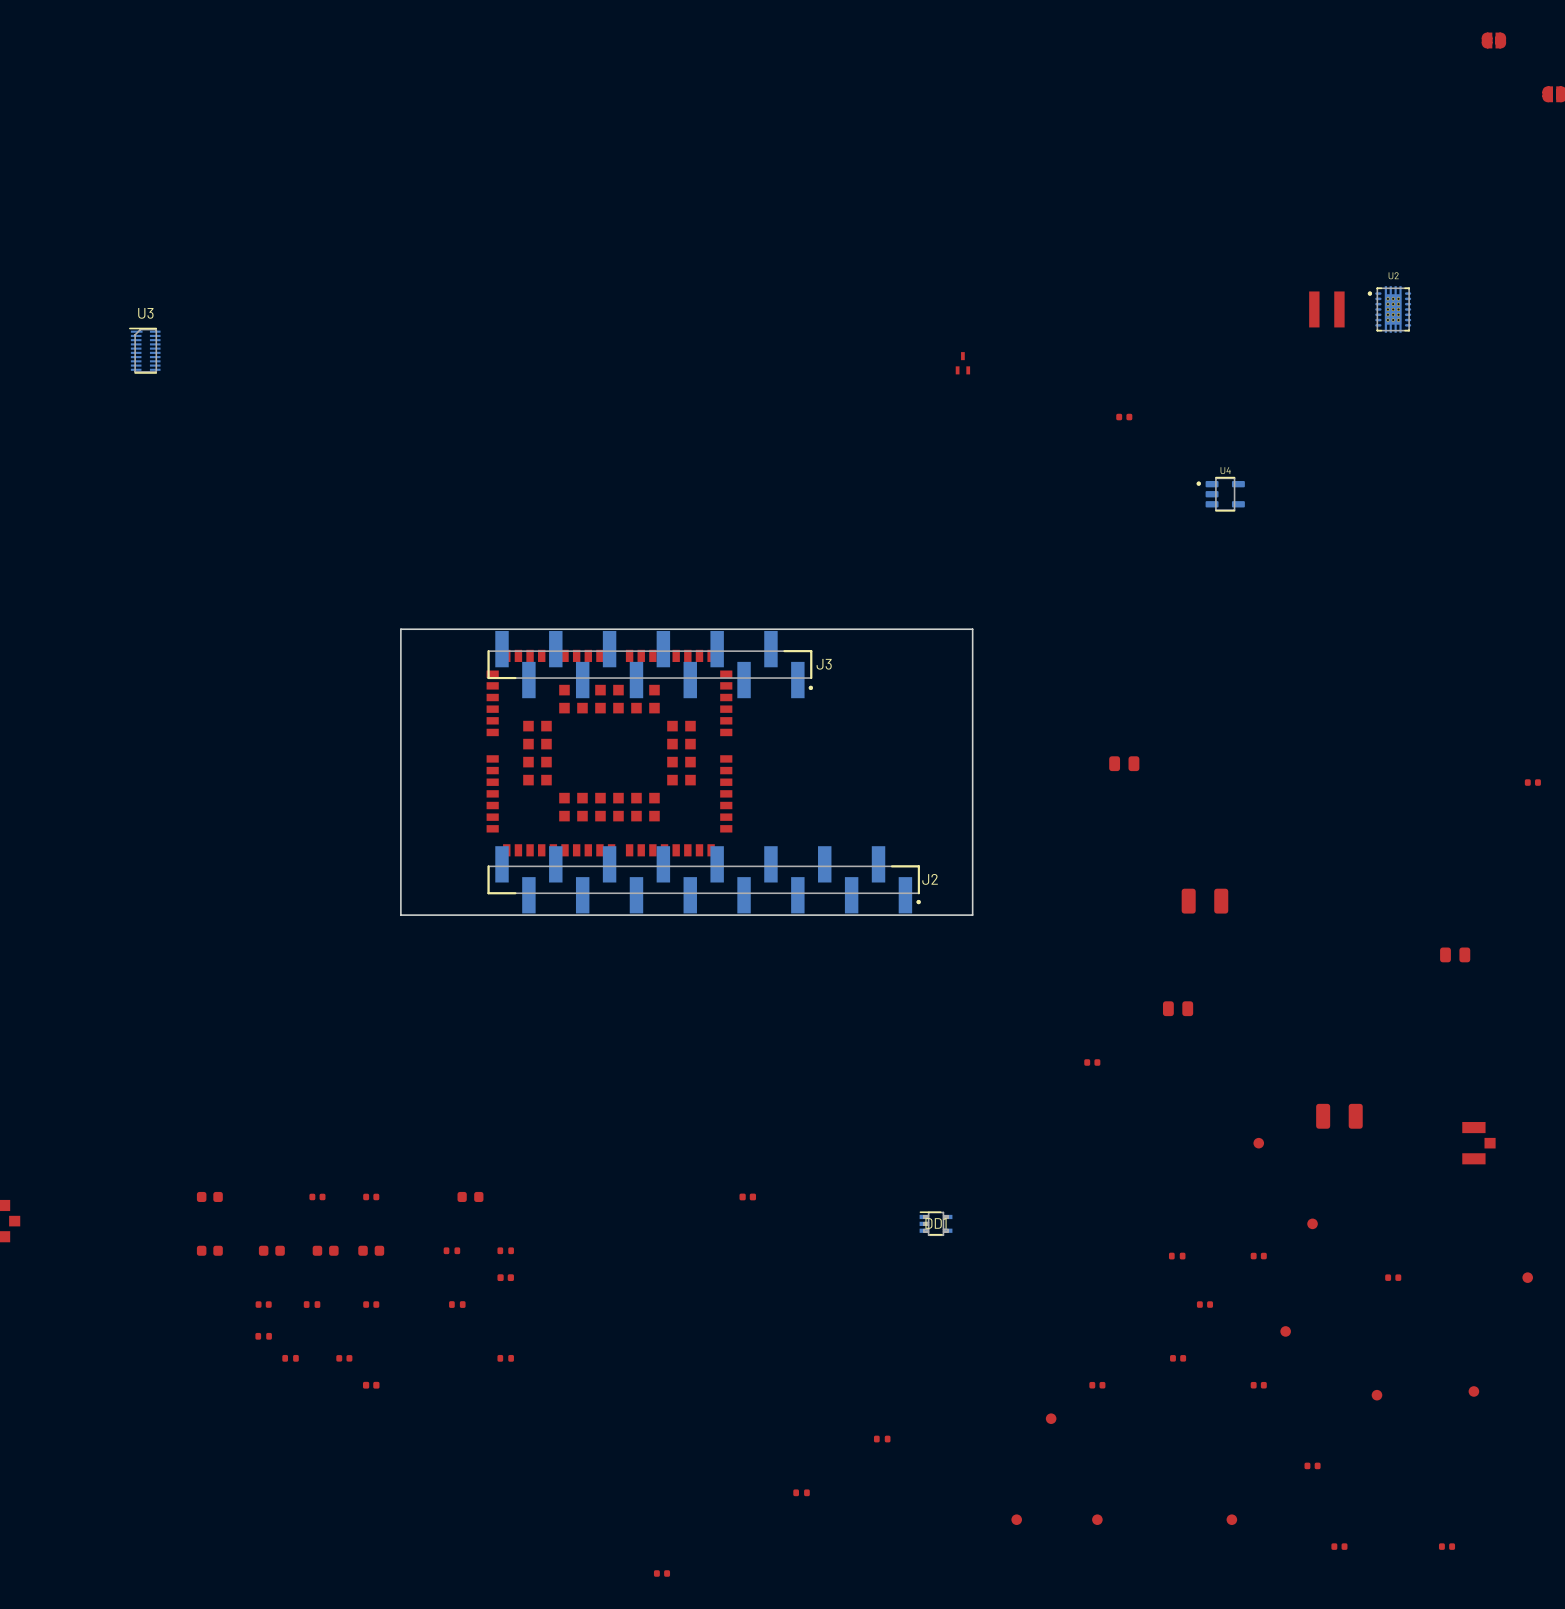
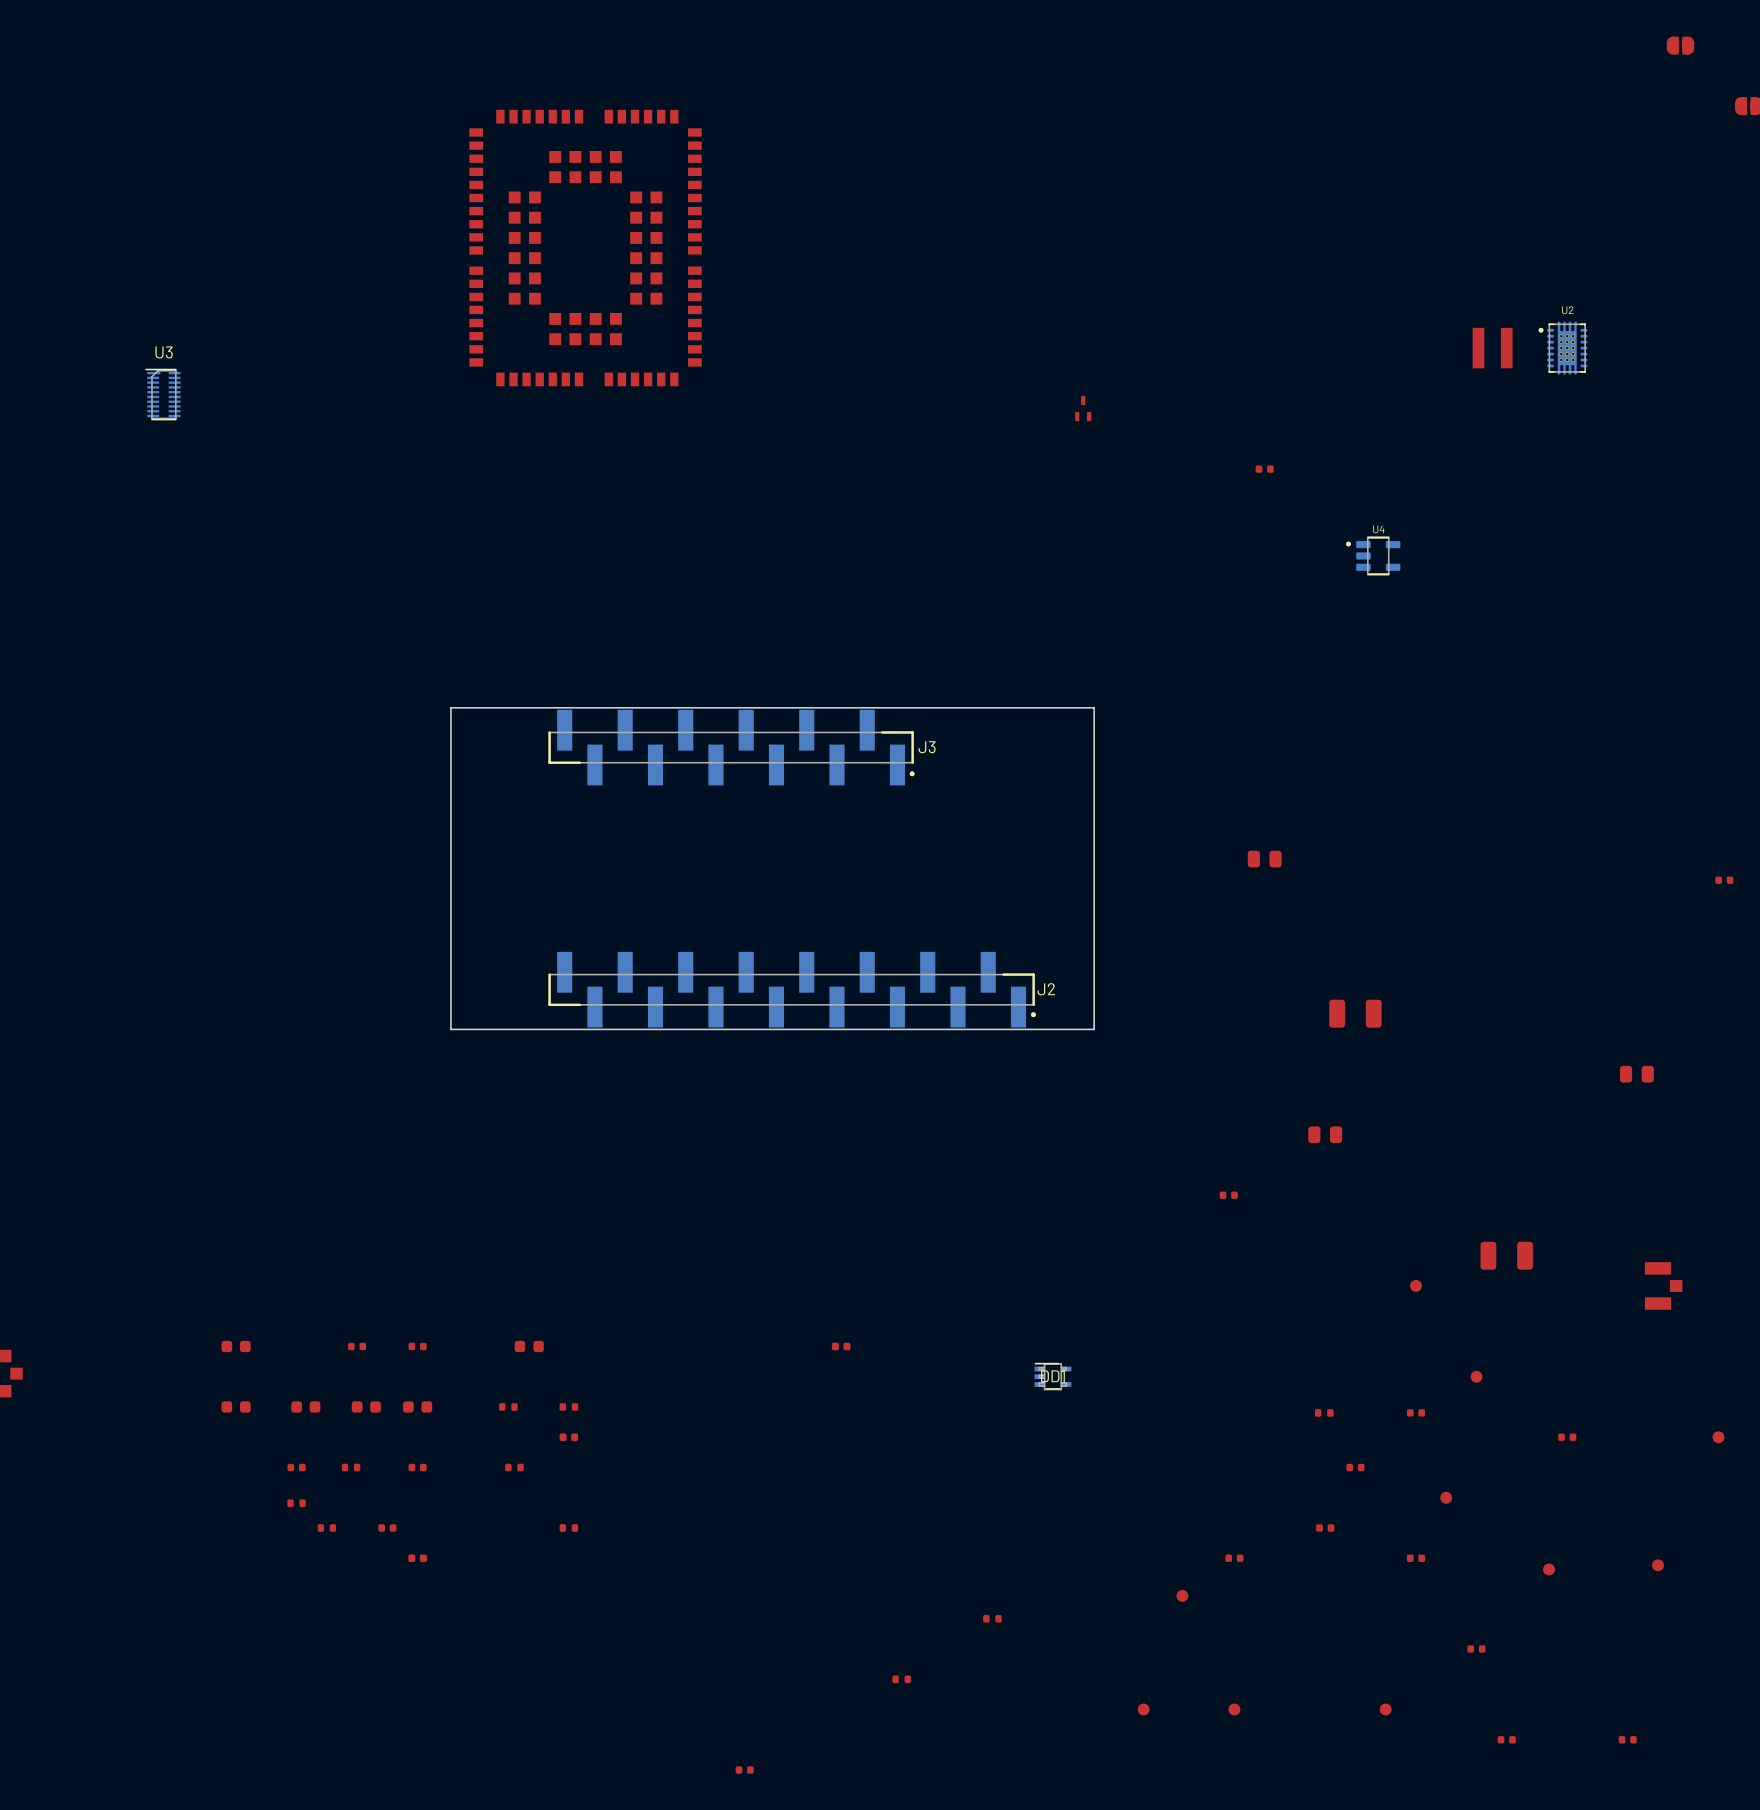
part: none -> (585, 248)
part: (609, 753) -> none

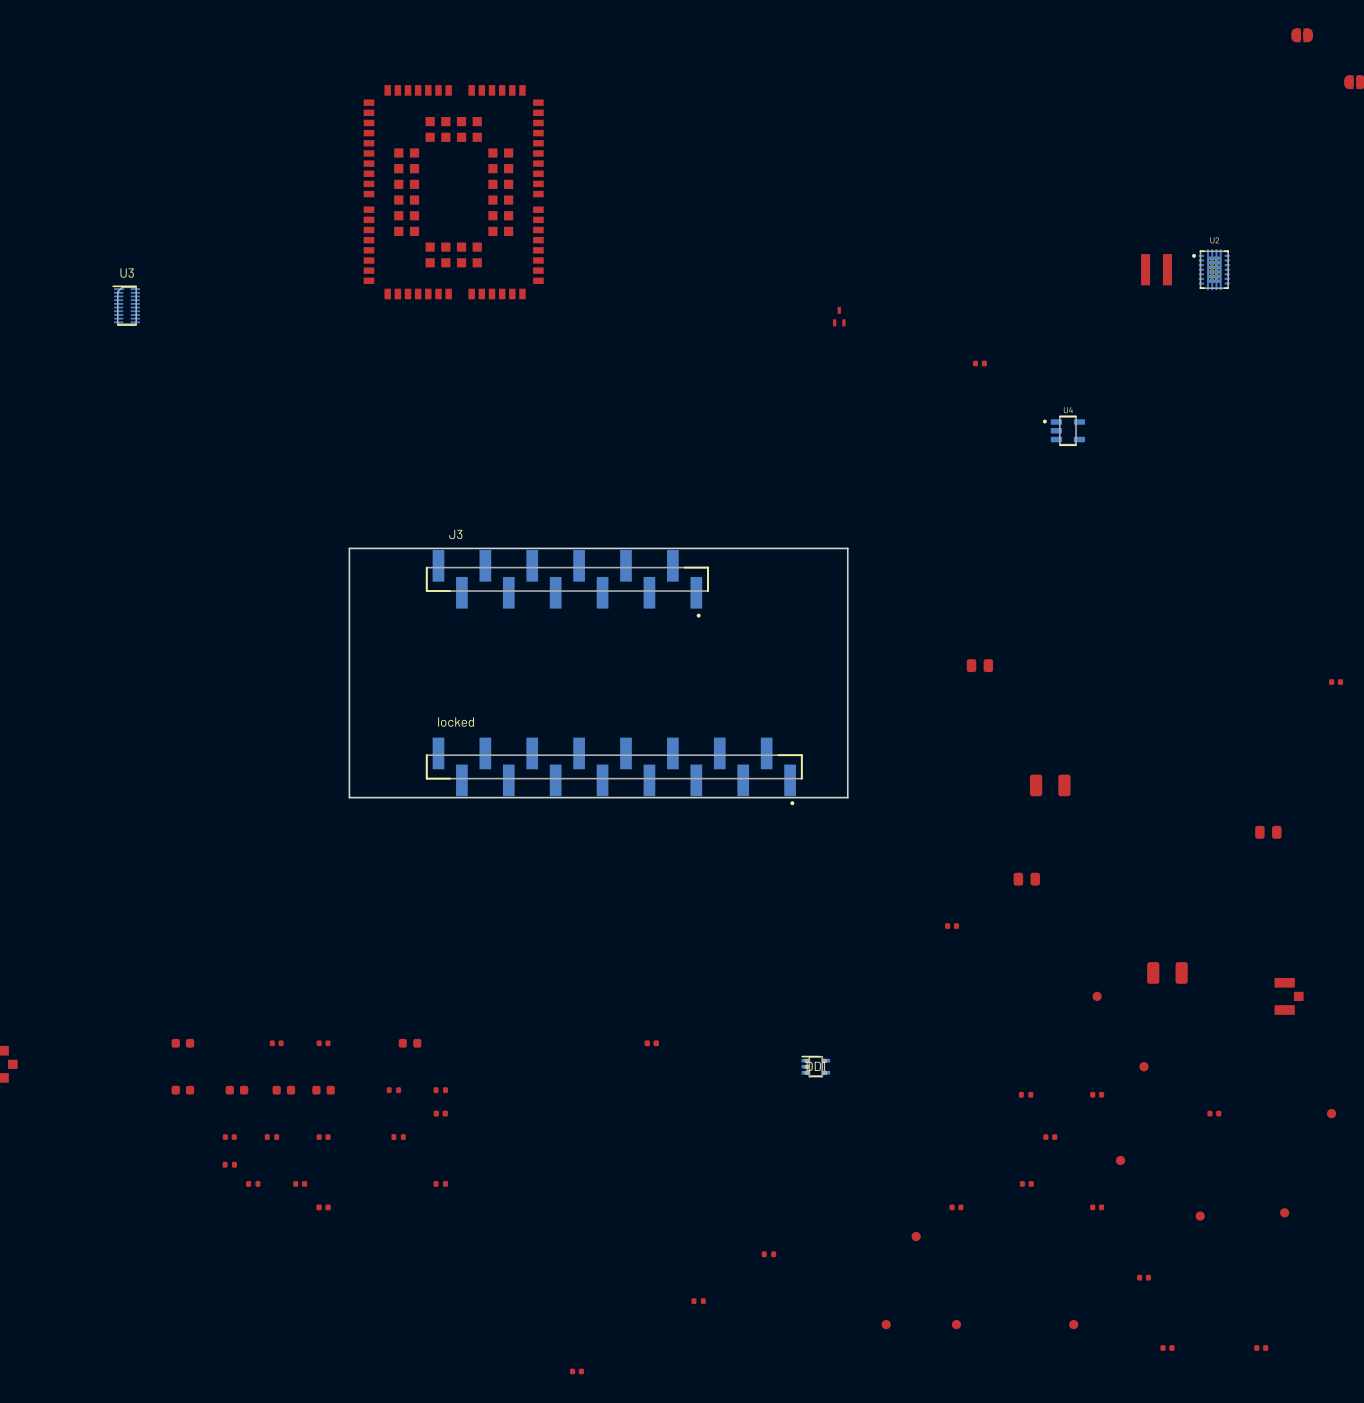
J3 footprint: [548, 709, 915, 786] -> [425, 550, 709, 618]
J3 name position: J3 (927, 747) -> J3 (455, 534)
J2: (792, 989) -> none
locked: none -> (614, 771)

